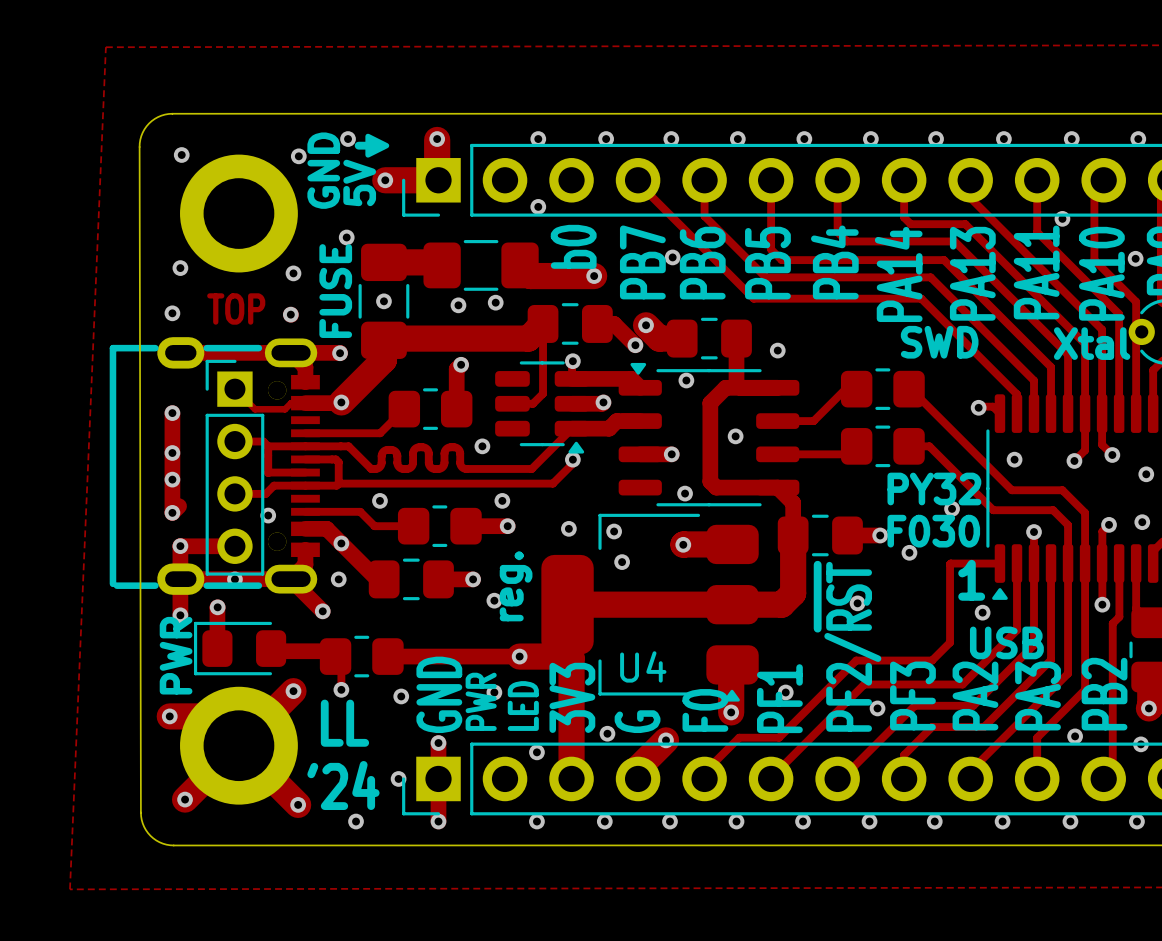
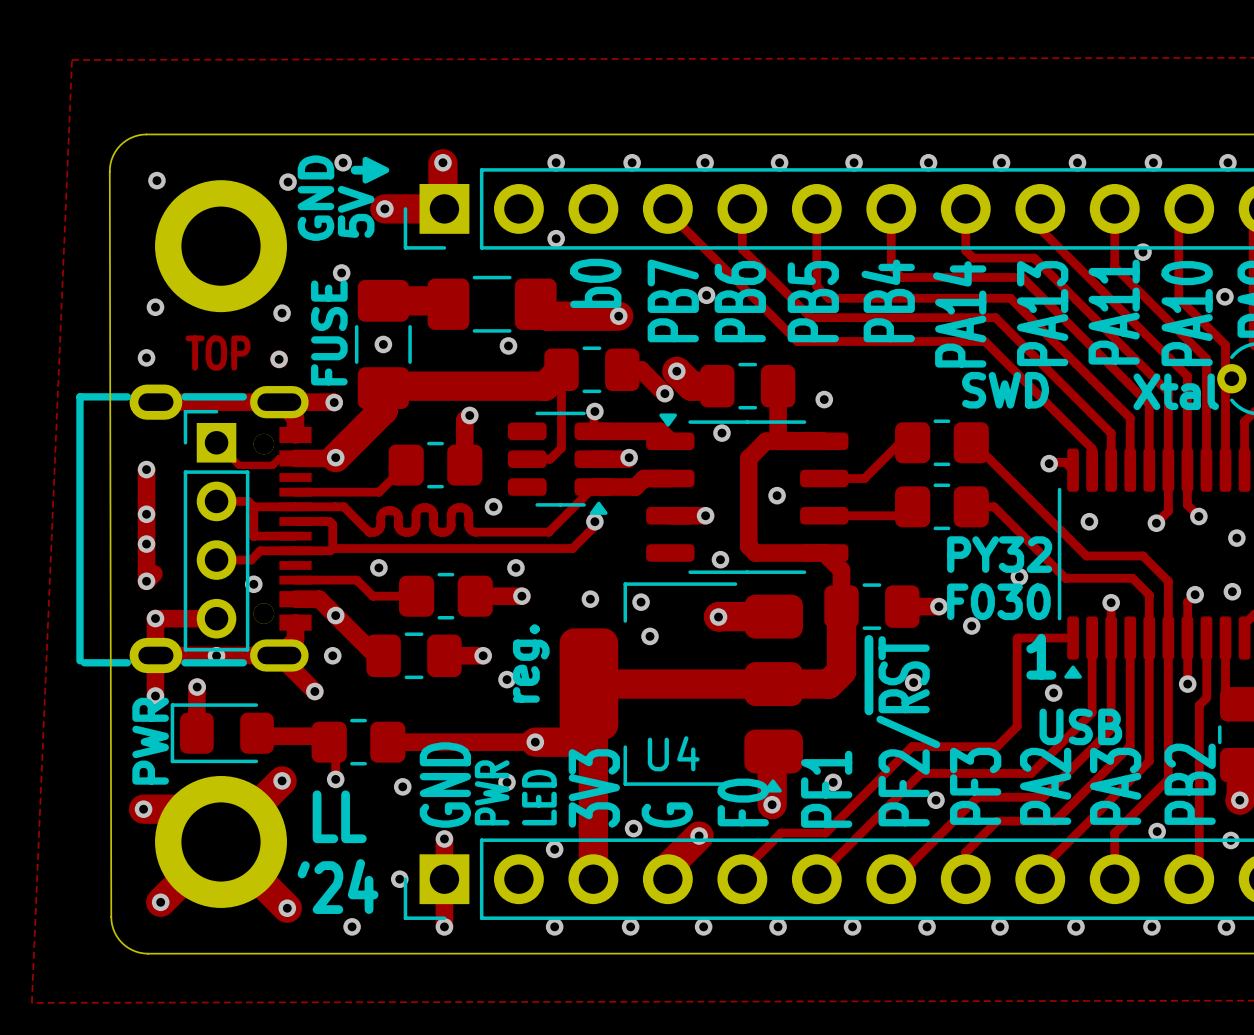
via: (458, 305) -> none

